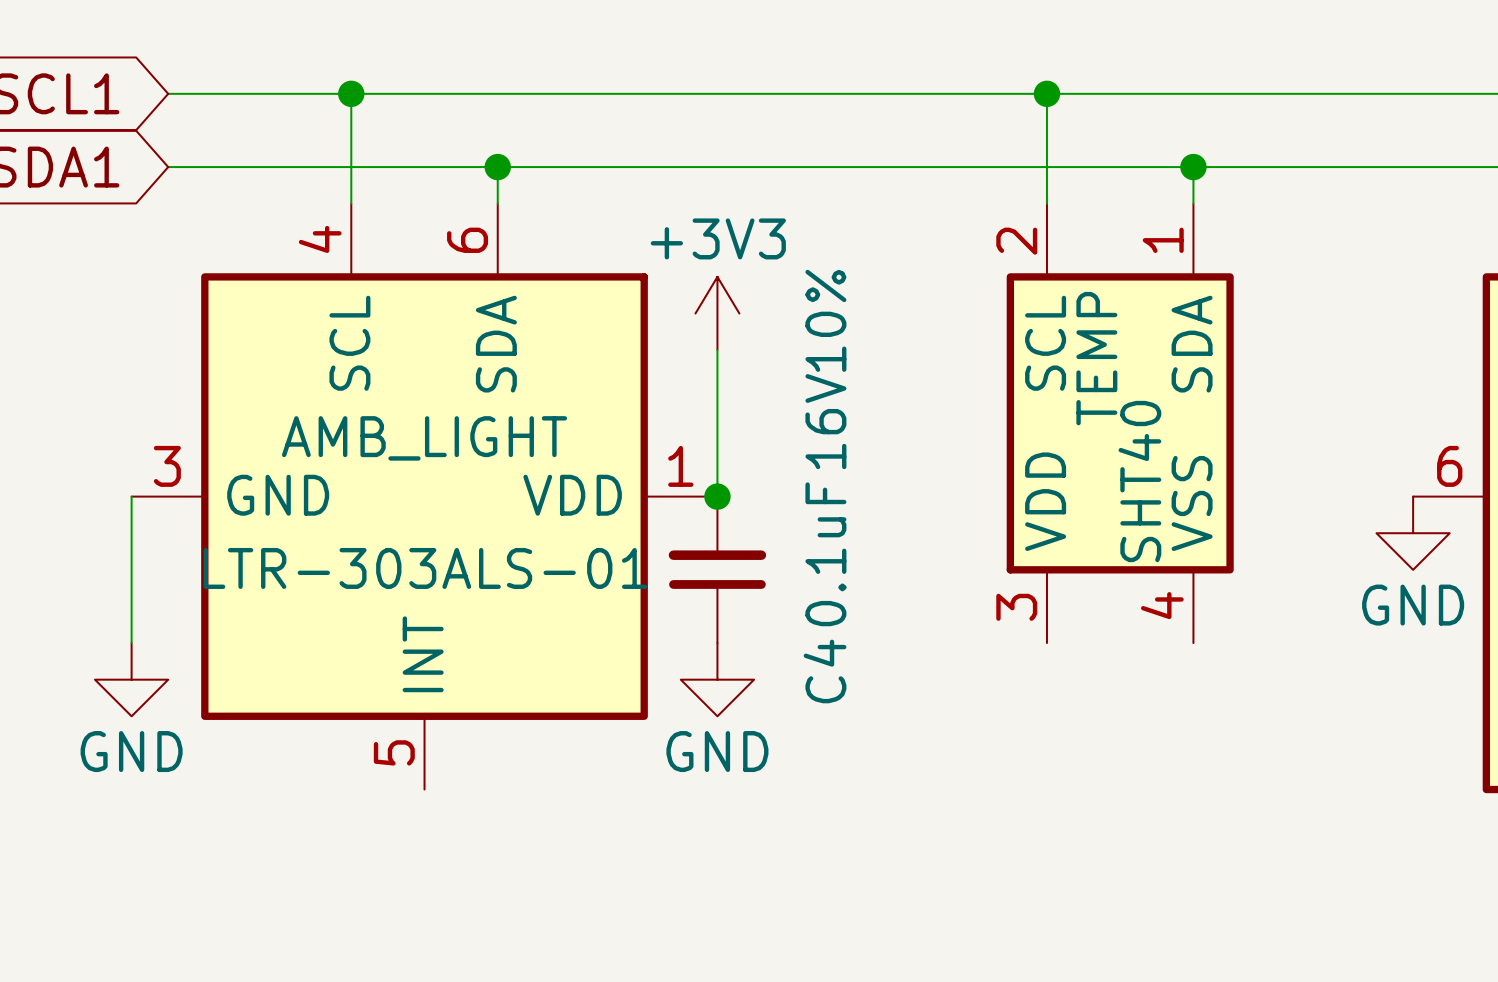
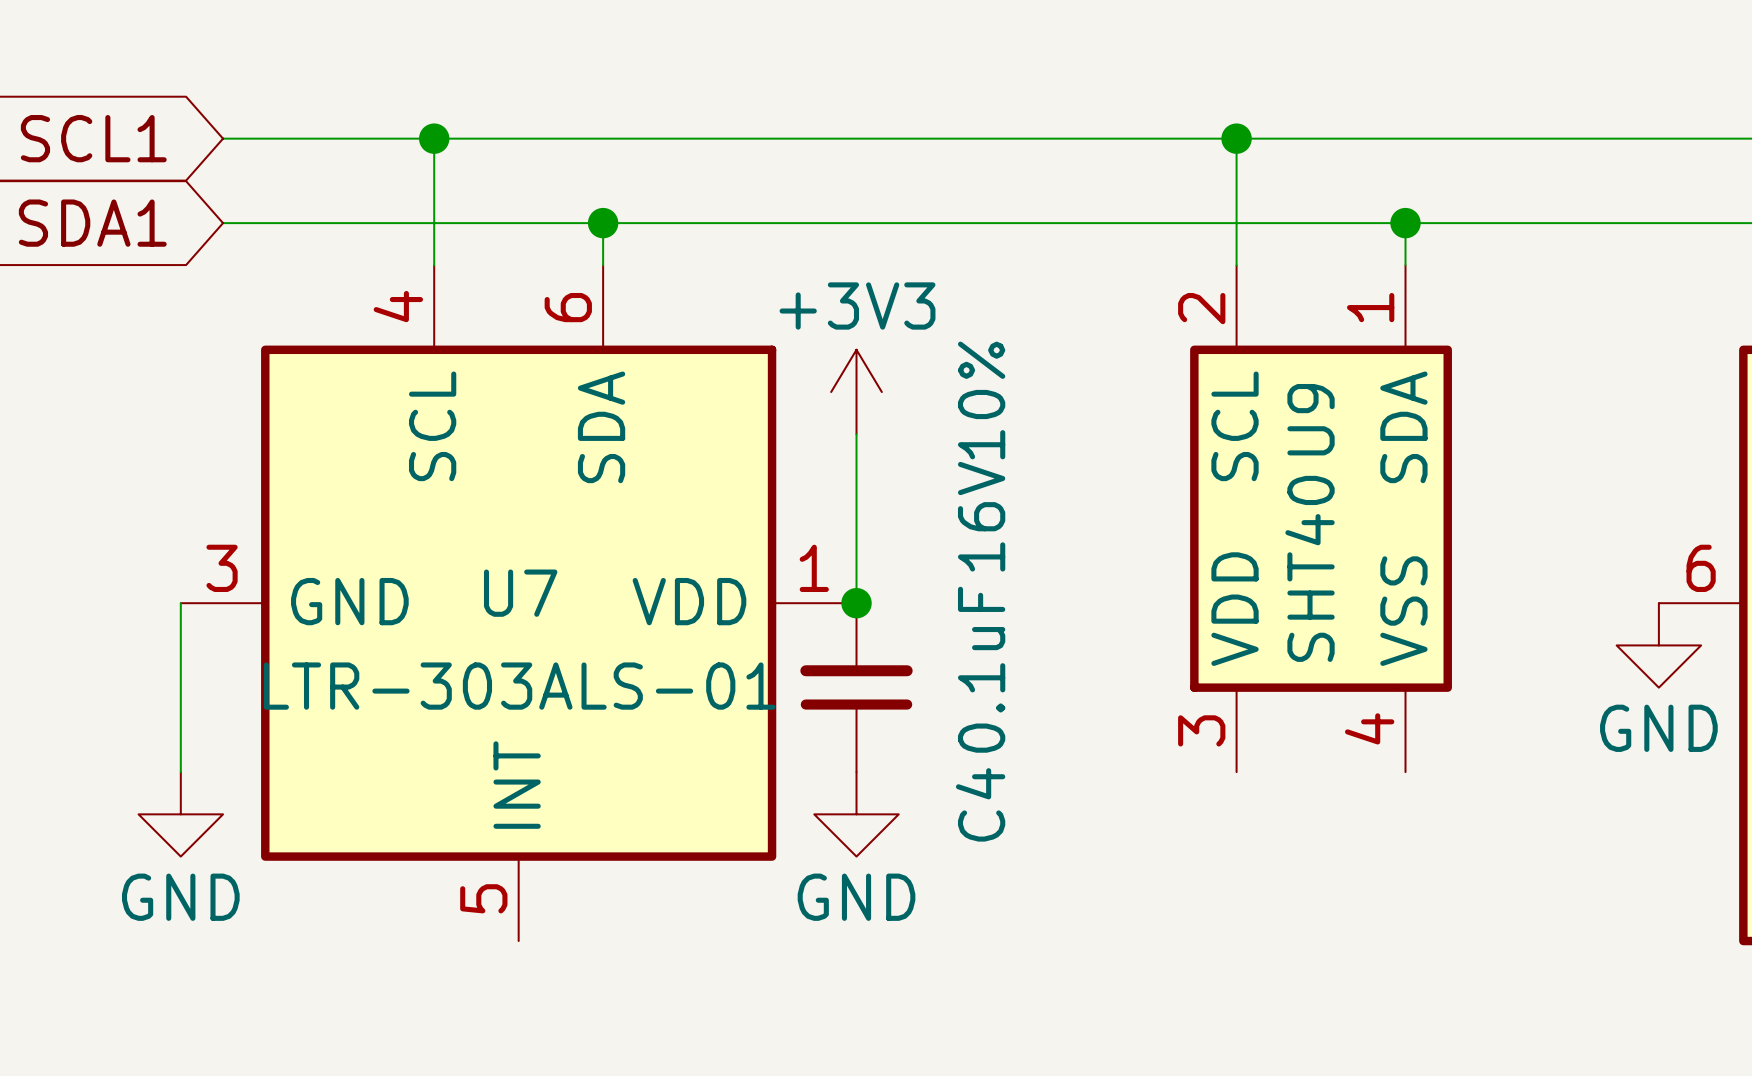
TEMP name: TEMP (1096, 358) -> U9 (1311, 419)
AMB_LIGHT name: AMB_LIGHT (424, 438) -> U7 (520, 593)
TEMP value position: SHT40 (1139, 481) -> SHT40 (1310, 568)

